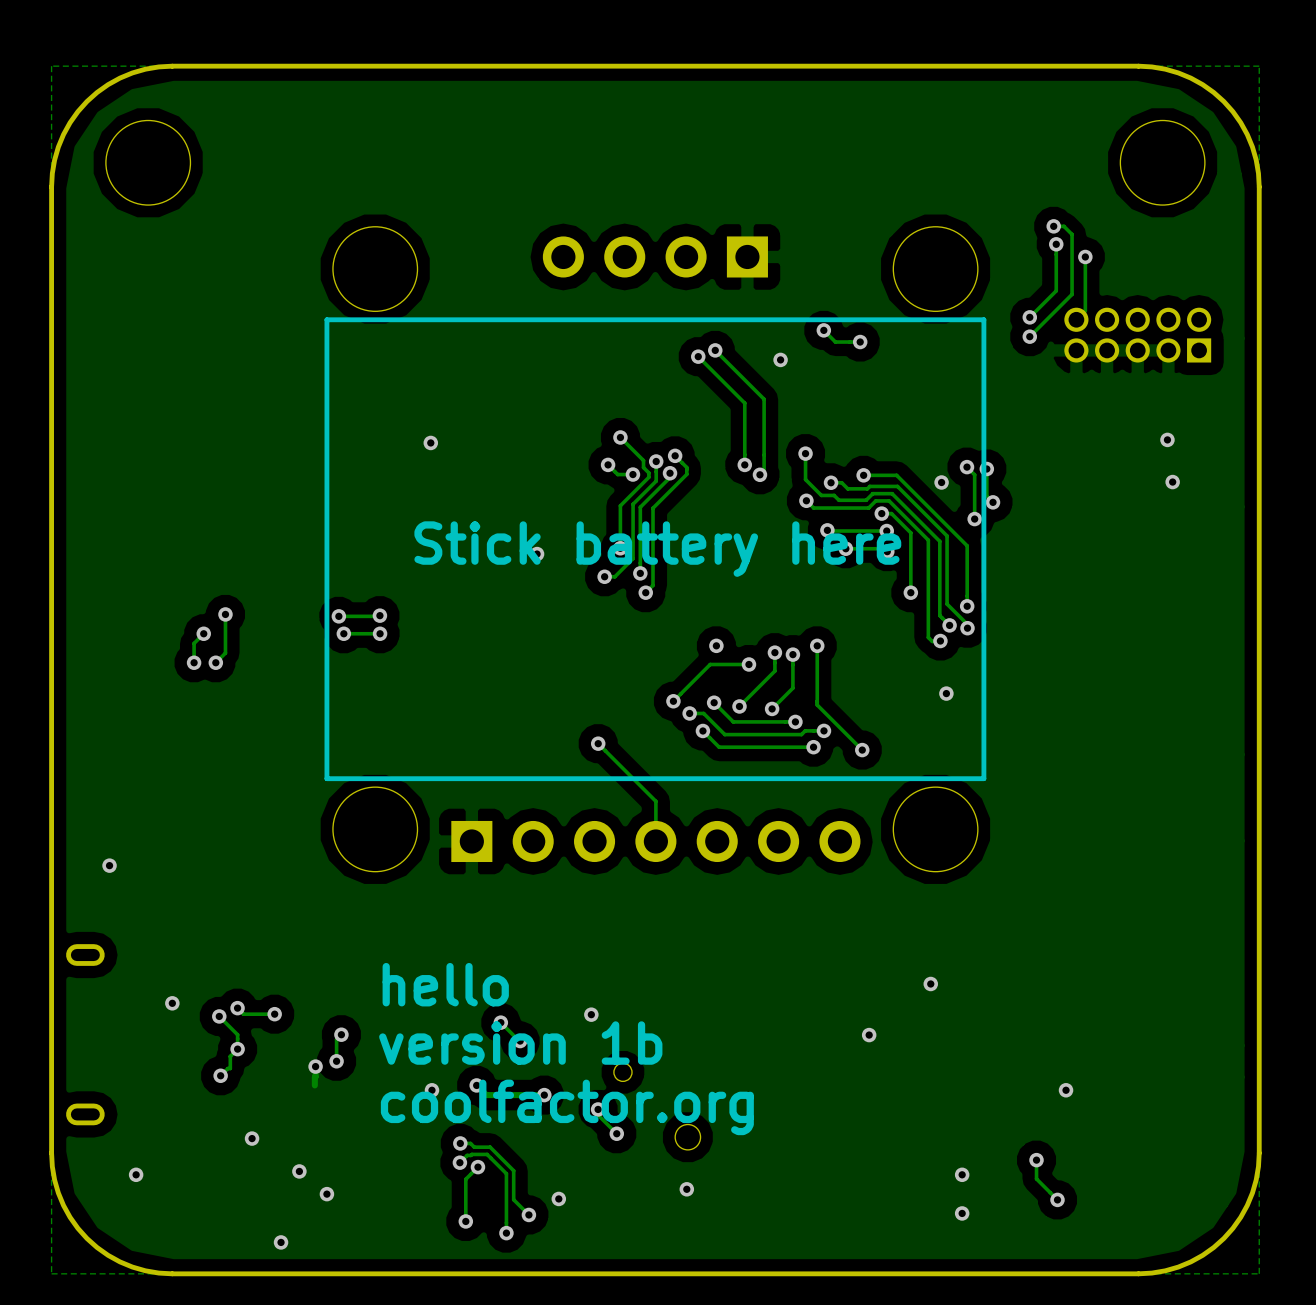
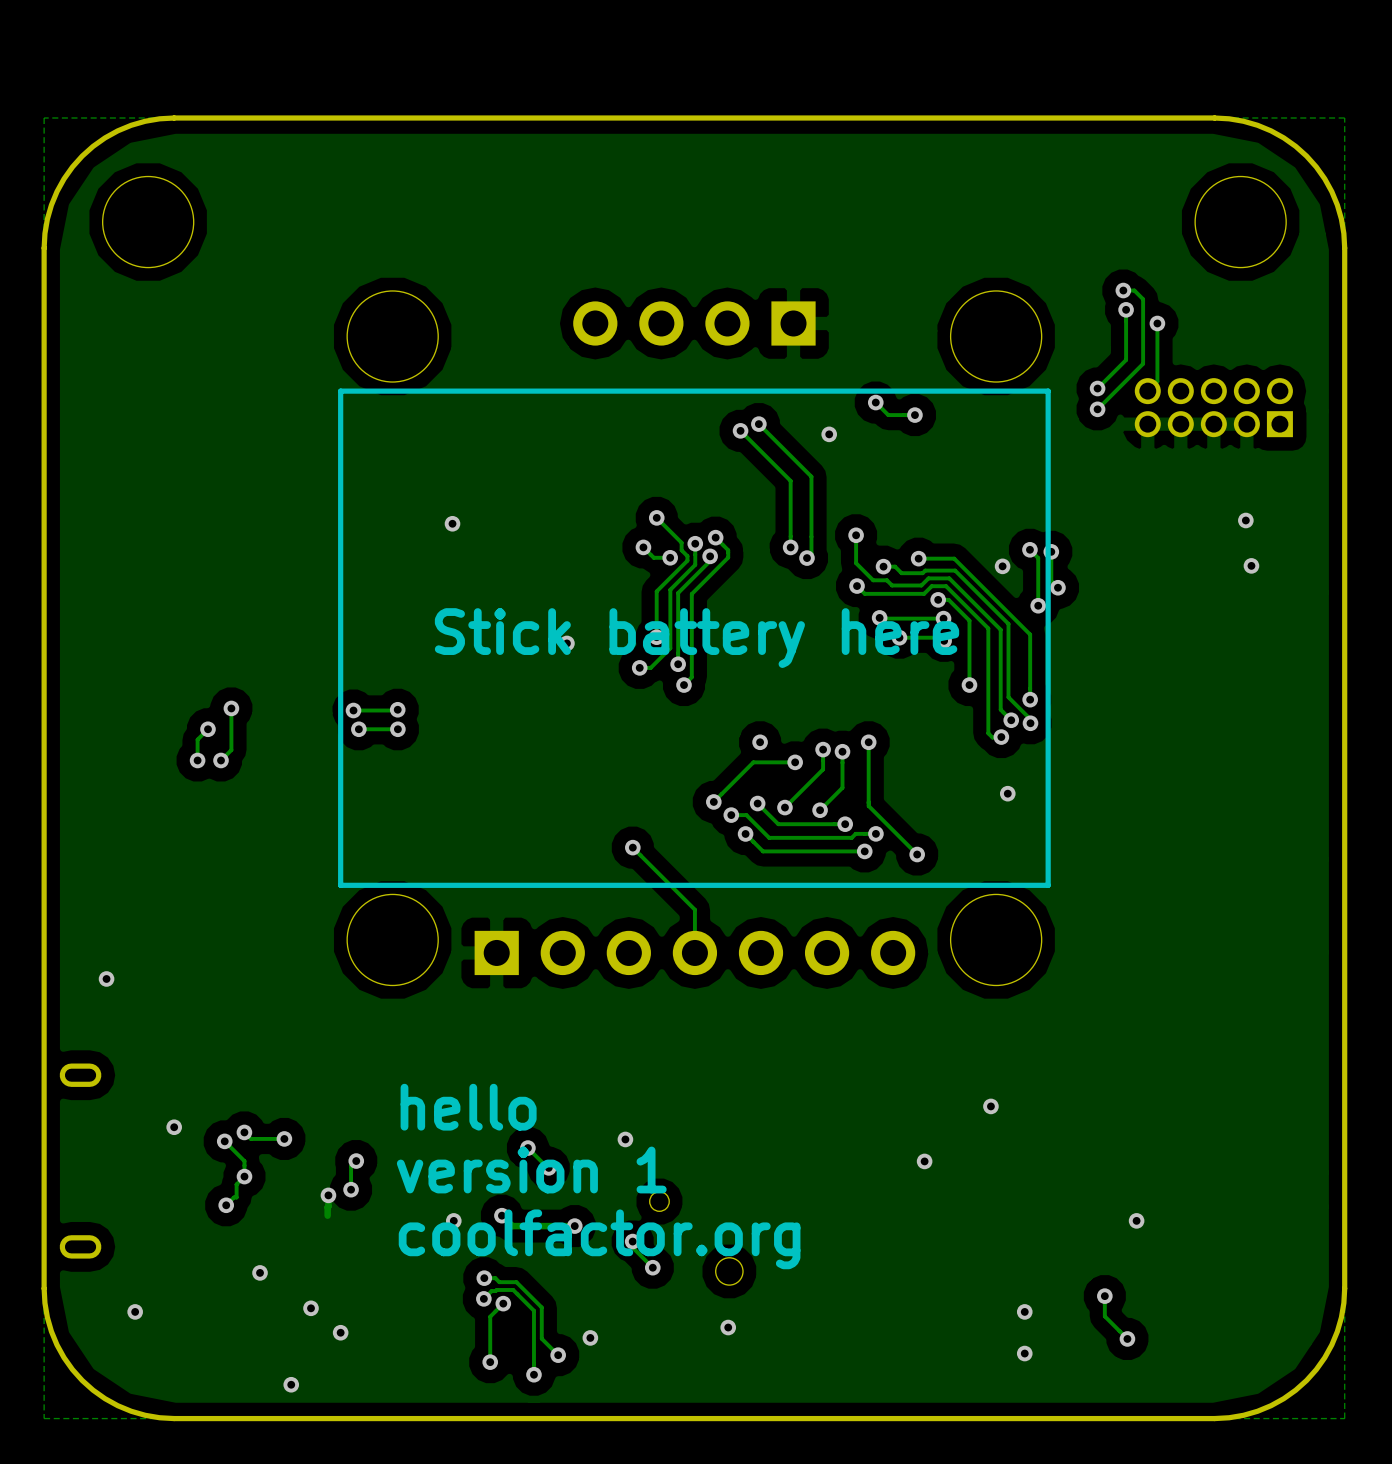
text: version 1b (520, 1043) -> version 1 (531, 1170)

